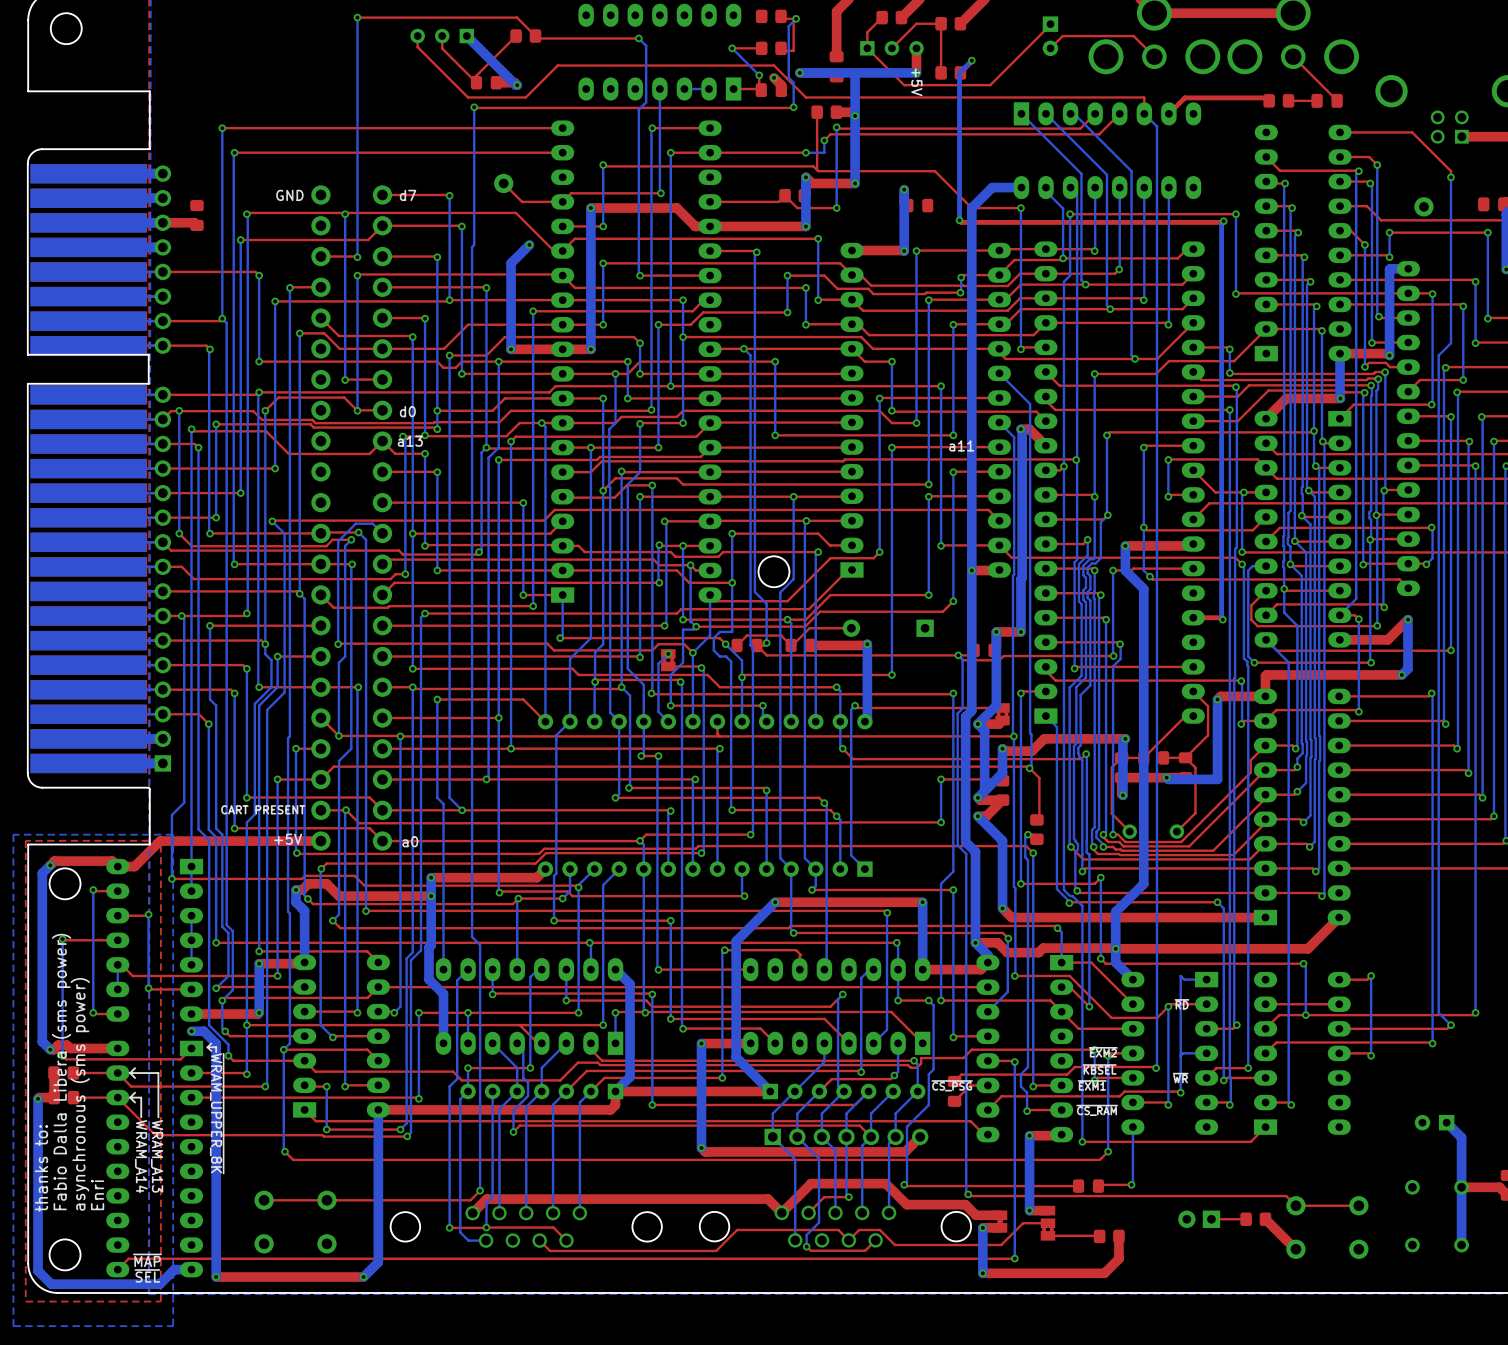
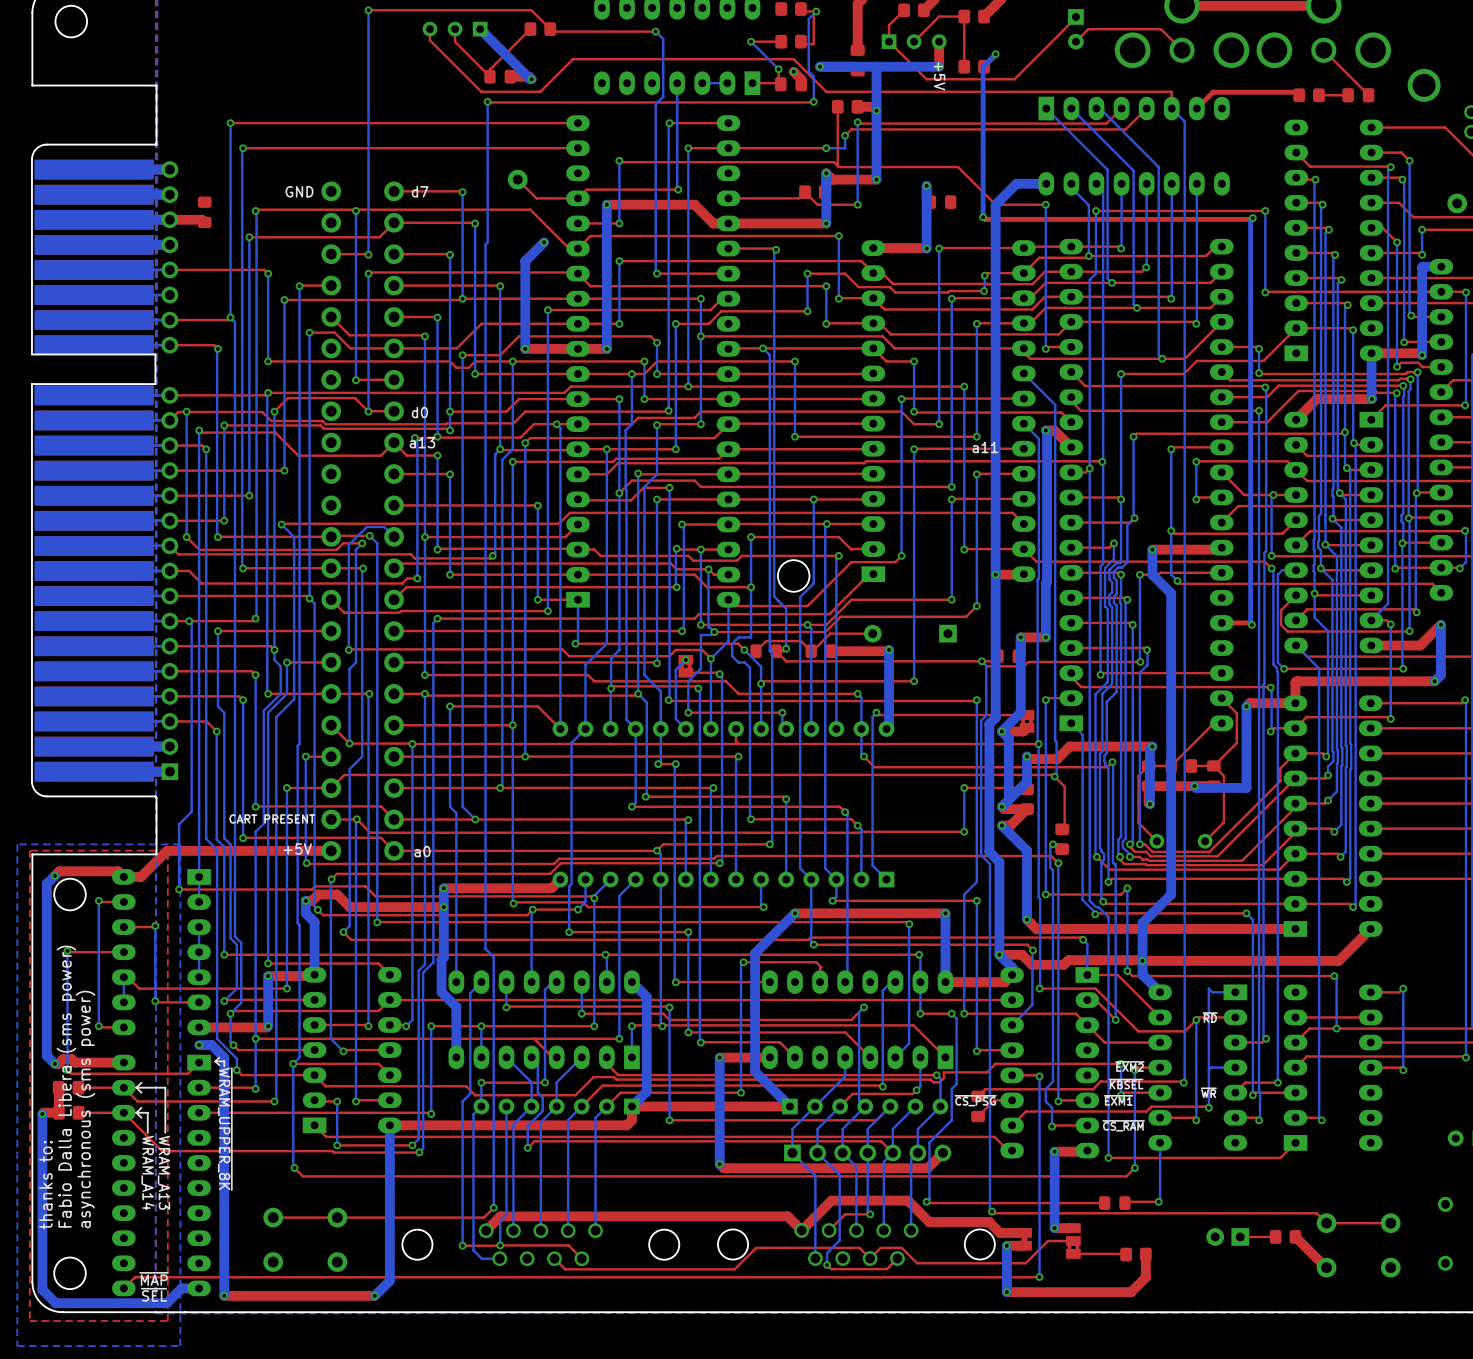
text: Enri (97, 1195) -> none

